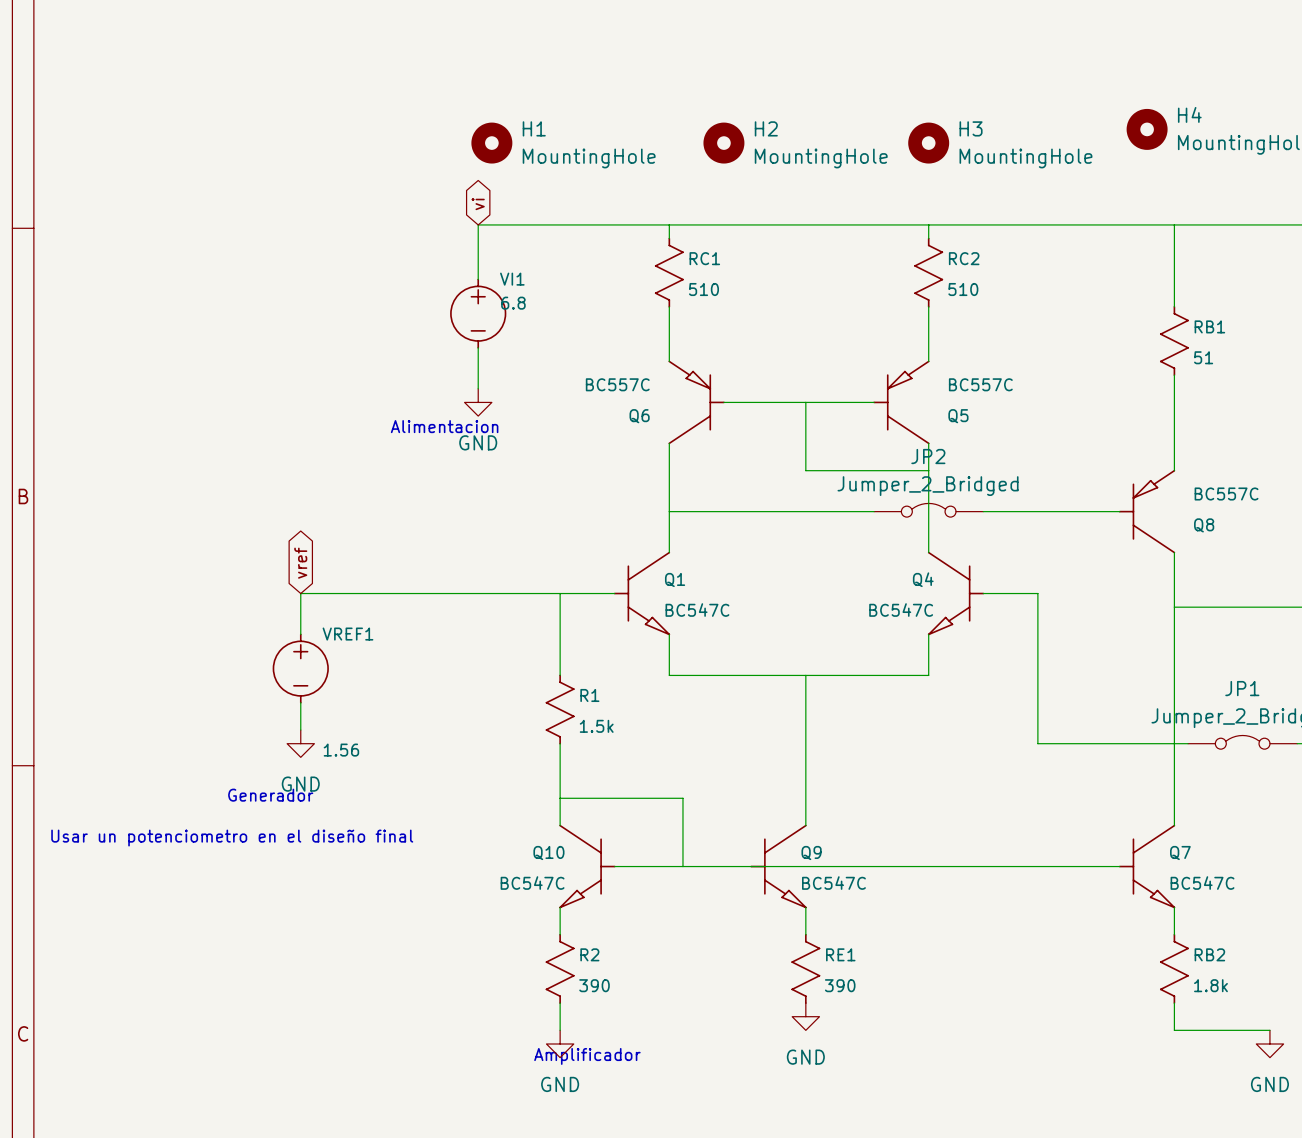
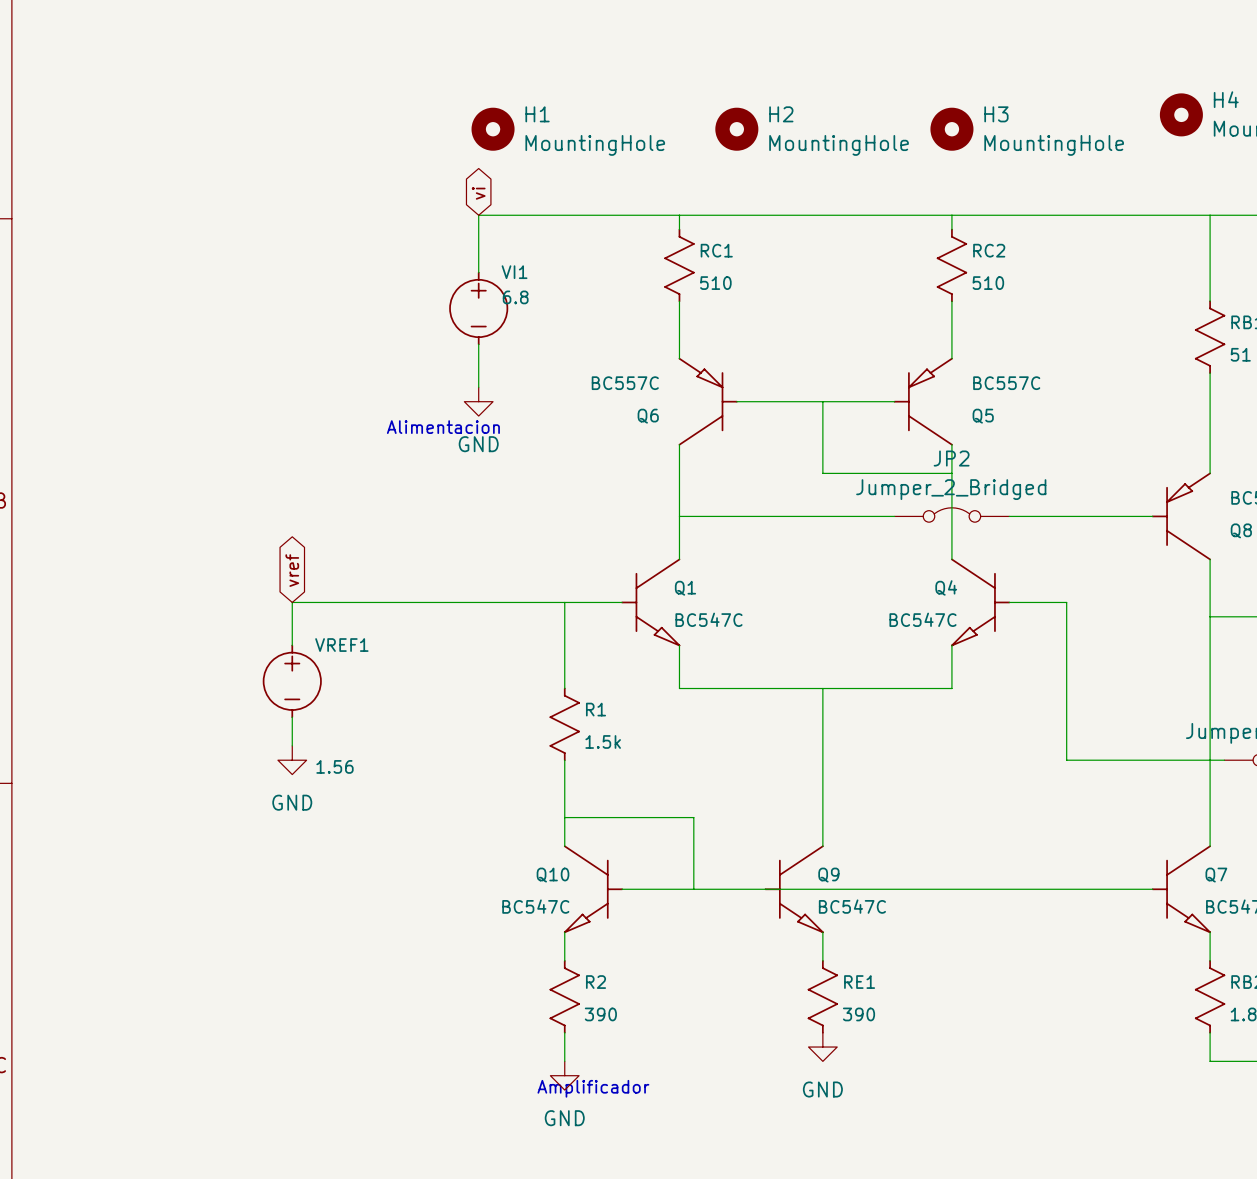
text: Generador (270, 795) -> none
text: Usar un potenciometro en el diseño final (232, 838) -> none

